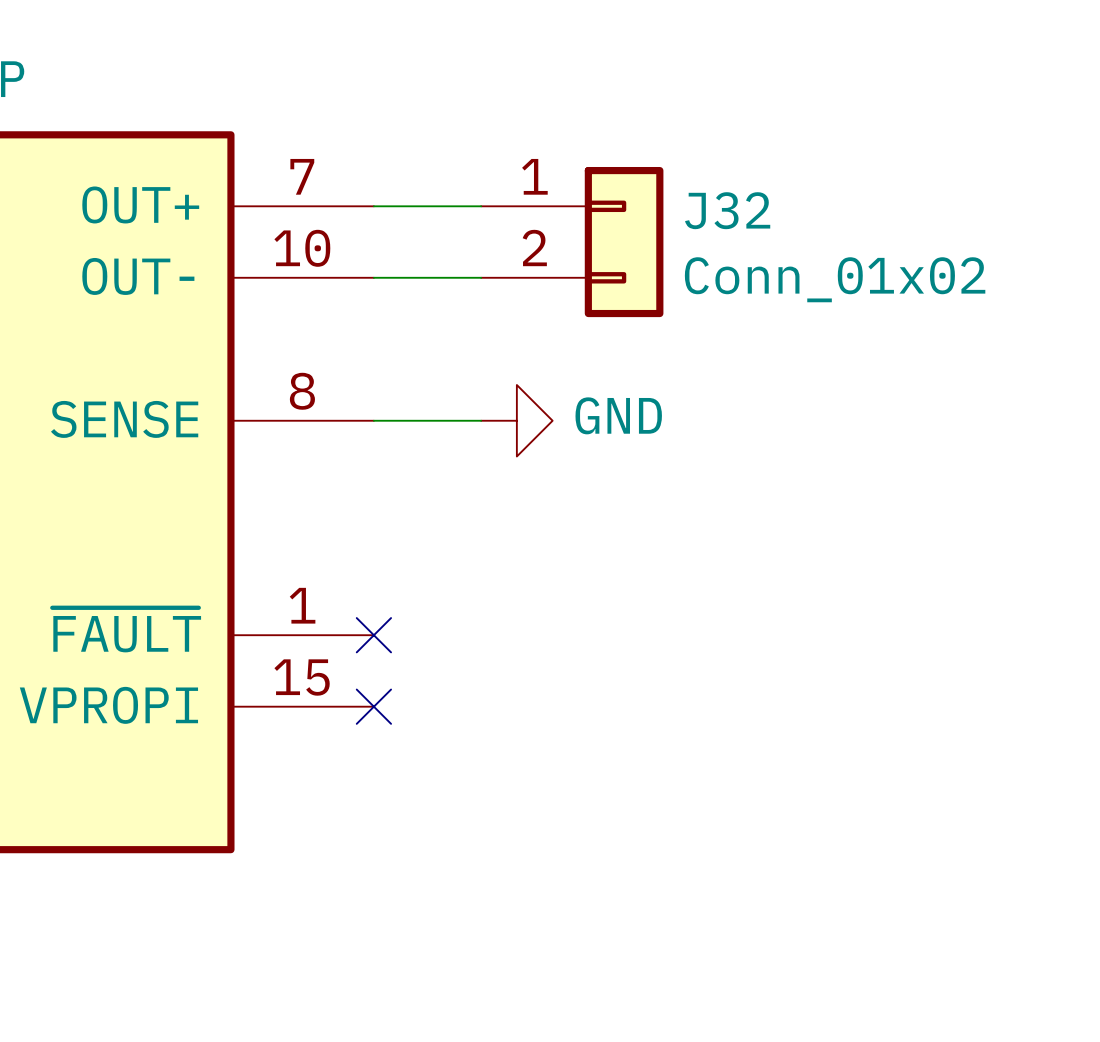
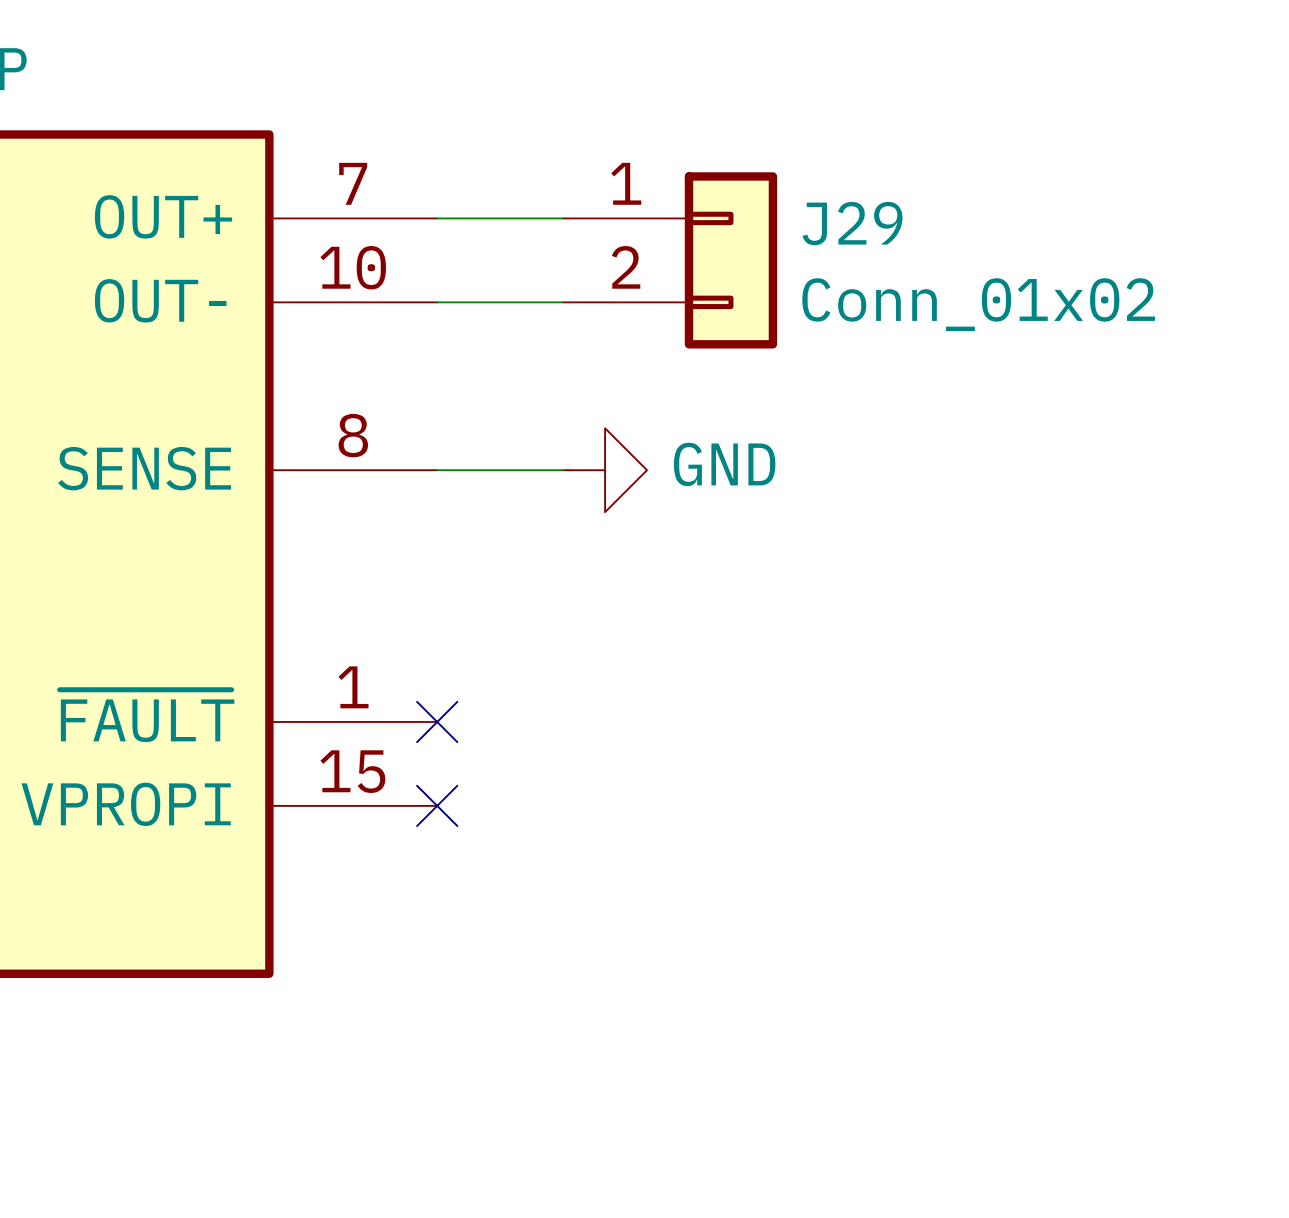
J32 name: J32 (727, 210) -> J29 (852, 223)

